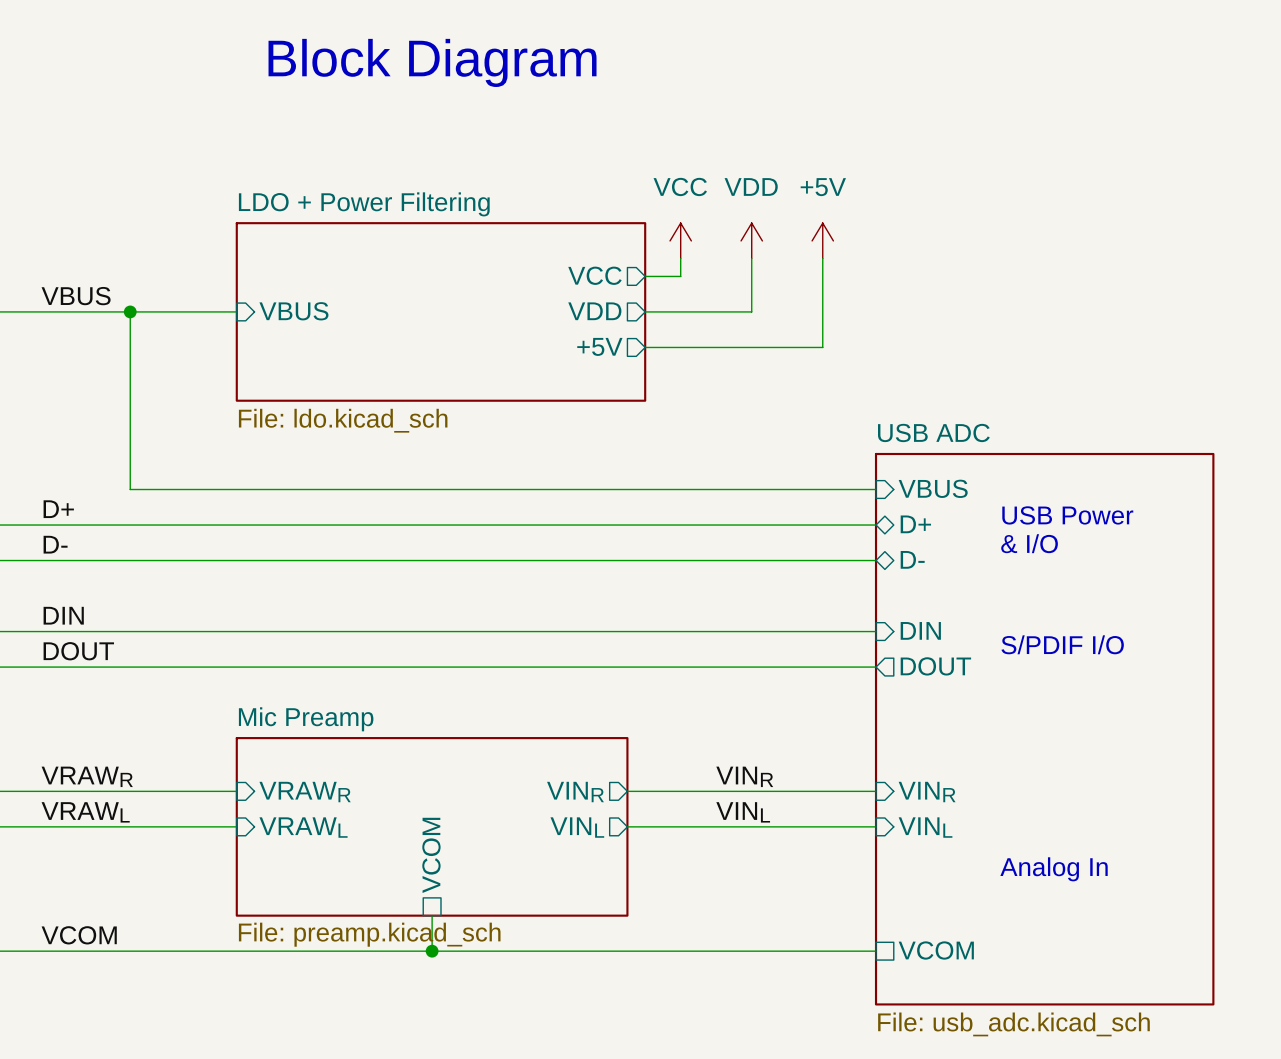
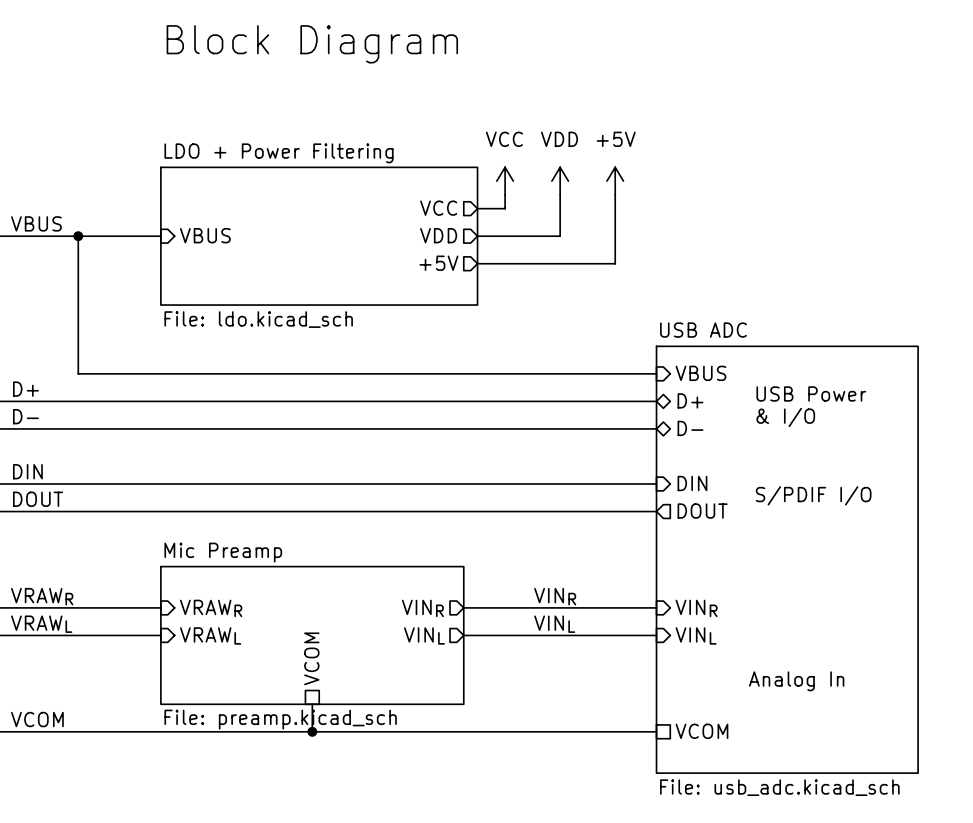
text position: Analog In (1054, 869) -> Analog In (796, 681)

